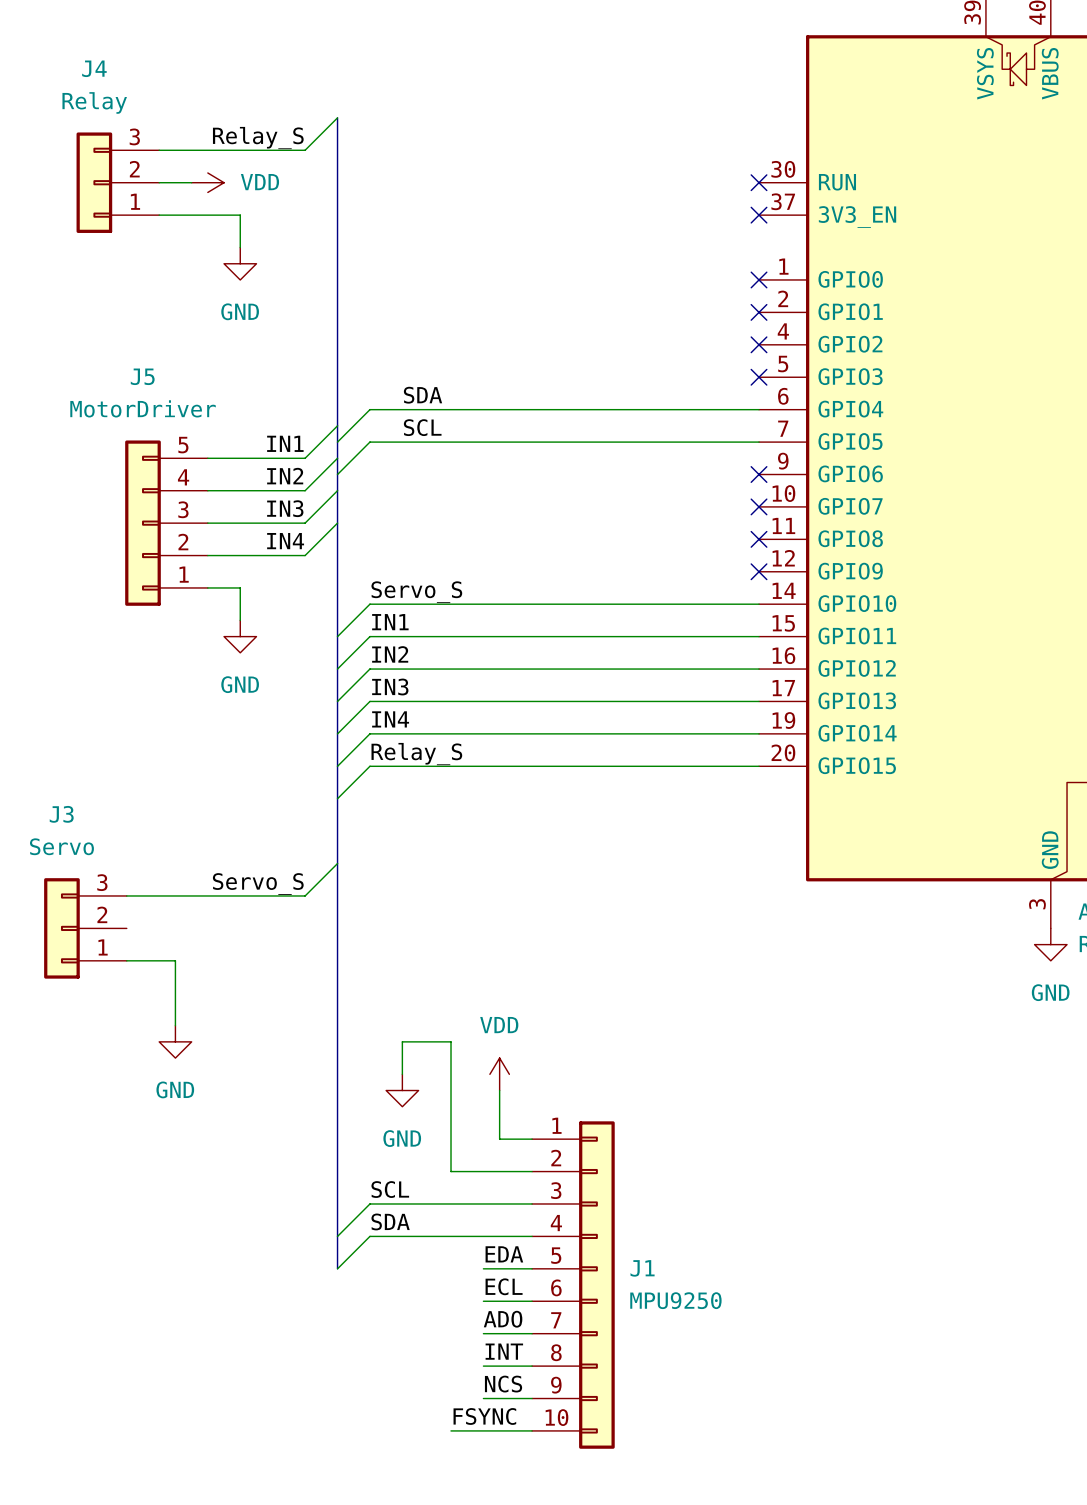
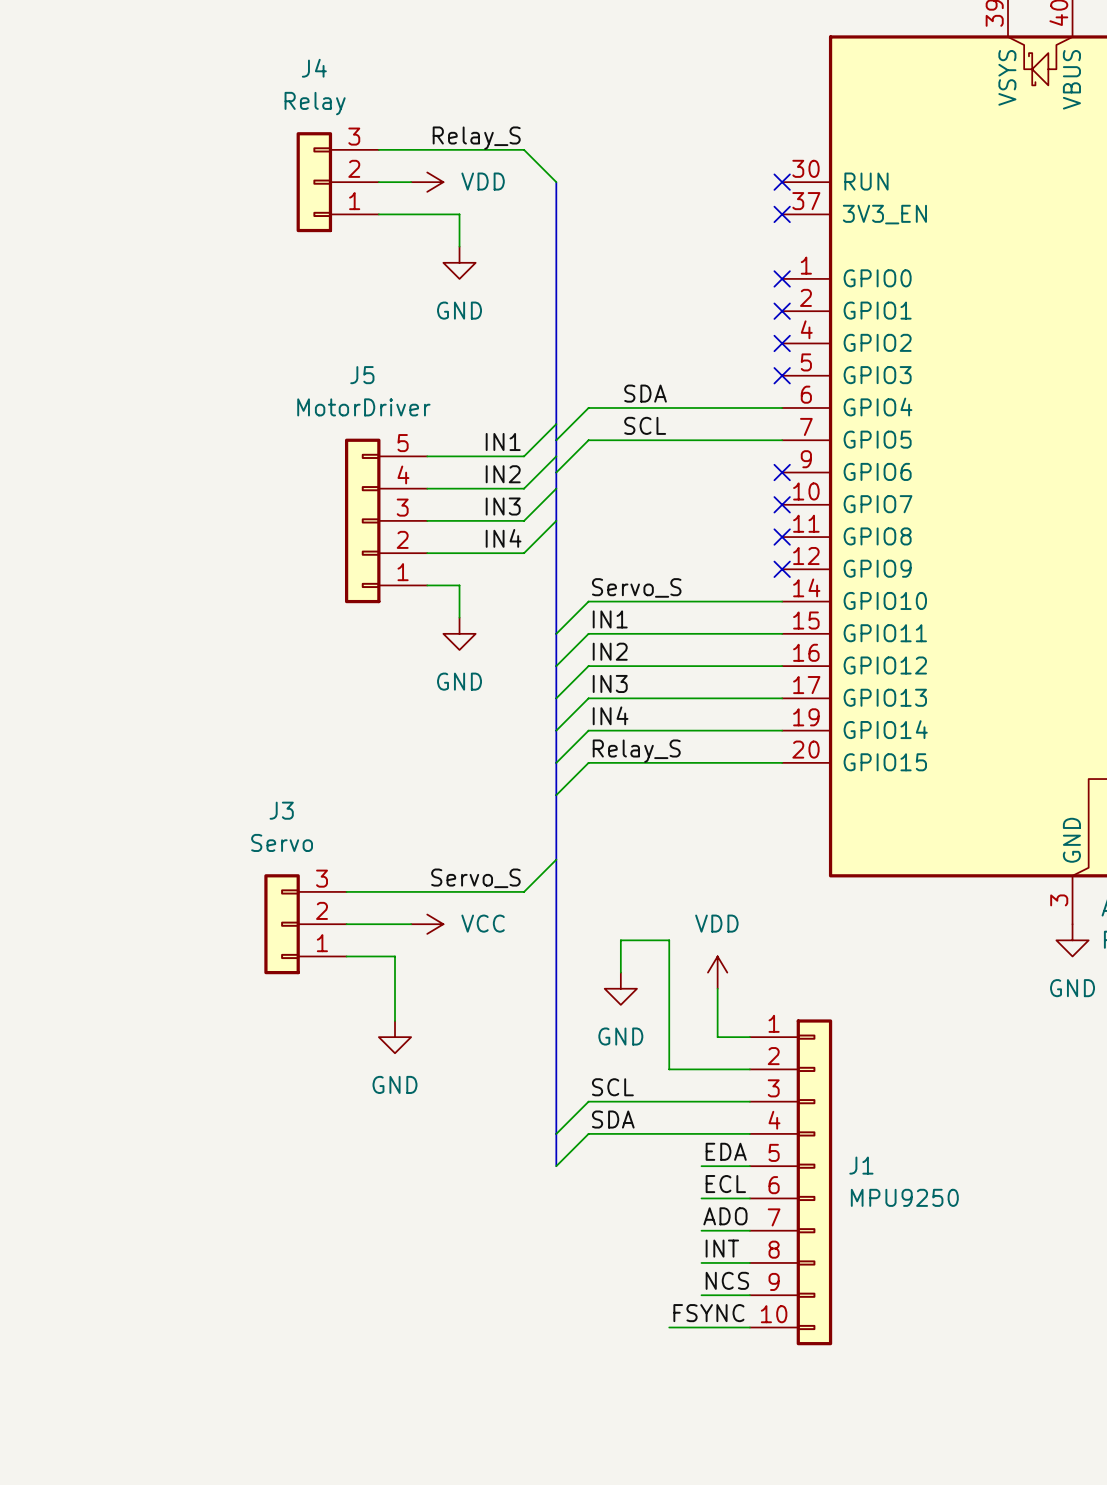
wire: (337, 117) (305, 150) (159, 150) -> none
bus: (337, 117) (337, 1268) -> none
label position: Relay_S (258, 138) -> Relay_S (476, 138)
wire: none -> (378, 149) (524, 149) (556, 182)
J4 position: (117, 182) -> (337, 182)
wire: (159, 182) (191, 182) -> (378, 182) (411, 182)
power symbol position: VDD (207, 182) -> VDD (427, 182)
bus: none -> (556, 182) (556, 1166)
wire: (159, 215) (240, 215) (240, 247) -> (378, 214) (459, 214) (459, 246)
power symbol position: GND (240, 263) -> GND (459, 262)
label position: SDA (423, 395) -> SDA (645, 393)
wire: (564, 409) (369, 409) (337, 442) -> (588, 407) (556, 440)
wire: (337, 425) (305, 458) (207, 458) -> (556, 424) (524, 456) (427, 456)
label position: SCL (422, 427) -> SCL (645, 425)
wire: (564, 442) (369, 442) (337, 474) -> (588, 440) (556, 472)
label: IN1 (285, 443) -> none
label: none -> IN1 (503, 441)
wire: (337, 458) (305, 490) (207, 490) -> (556, 456) (524, 488) (427, 488)
label: IN2 (285, 476) -> none
label: none -> IN2 (503, 474)
wire: (337, 490) (305, 523) (207, 523) -> (556, 488) (524, 520) (427, 520)
label: IN3 (285, 508) -> none
label: none -> IN3 (503, 506)
J5 position: (166, 523) -> (386, 520)
wire: (337, 523) (305, 555) (207, 555) -> (556, 520) (524, 553) (427, 553)
label: IN4 (285, 541) -> none
label: none -> IN4 (503, 538)
wire: (207, 587) (240, 587) (240, 620) -> (427, 585) (459, 585) (459, 617)
label: Servo_S (416, 592) -> none
label: none -> Servo_S (636, 587)
wire: (564, 604) (369, 604) (337, 636) -> (588, 601) (556, 633)
label: IN1 (390, 622) -> none
label: none -> IN1 (610, 619)
power symbol position: GND (240, 636) -> GND (459, 633)
wire: (564, 636) (369, 636) (337, 669) -> (588, 633) (556, 666)
label: IN2 (390, 654) -> none
label: none -> IN2 (610, 651)
wire: (564, 669) (369, 669) (337, 701) -> (588, 666) (556, 698)
label: IN3 (390, 687) -> none
label: none -> IN3 (610, 683)
wire: (564, 701) (369, 701) (337, 733) -> (588, 698) (556, 730)
label: IN4 (390, 719) -> none
label: none -> IN4 (610, 715)
wire: (564, 733) (369, 733) (337, 766) -> (588, 730) (556, 762)
label position: Relay_S (416, 754) -> Relay_S (636, 751)
wire: (564, 766) (369, 766) (337, 798) -> (588, 762) (556, 795)
wire: (337, 863) (305, 895) (126, 895) -> (556, 859) (524, 891) (346, 891)
label: Servo_S (258, 883) -> none
label: none -> Servo_S (475, 878)
J3 position: (85, 928) -> (305, 924)
wire: none -> (346, 924) (411, 924)
power symbol: none -> VCC (427, 924)
wire: (126, 960) (175, 960) (175, 1025) -> (346, 956) (395, 956) (395, 1021)
wire: none -> (620, 972) (620, 940) (669, 940) (669, 1069) (749, 1069)
power symbol: none -> GND (620, 988)
wire: none -> (717, 988) (717, 1037) (749, 1037)
power symbol: GND (175, 1041) -> none
wire: (402, 1074) (402, 1041) (451, 1041) (451, 1171) (532, 1171) -> (749, 1133) (588, 1133) (556, 1166)
power symbol position: VDD (499, 1074) -> VDD (717, 972)
power symbol position: GND (402, 1090) -> GND (395, 1037)
wire: (499, 1090) (499, 1139) (532, 1139) -> (749, 1101) (588, 1101) (556, 1133)
label position: SCL (390, 1189) -> SCL (612, 1087)
wire: (532, 1203) (369, 1203) (337, 1236) -> none
label position: SDA (390, 1221) -> SDA (613, 1119)
wire: (532, 1236) (369, 1236) (337, 1268) -> none
label position: EDA (504, 1254) -> EDA (726, 1151)
wire: (483, 1268) (532, 1268) -> (701, 1262) (749, 1262)
J1 position: (573, 1285) -> (791, 1182)
label position: ECL (504, 1286) -> ECL (725, 1184)
wire: (483, 1301) (532, 1301) -> (701, 1295) (749, 1295)
label position: ADO (503, 1319) -> ADO (725, 1216)
wire: (483, 1333) (532, 1333) -> (701, 1230) (749, 1230)
label position: INT (504, 1351) -> INT (722, 1248)
wire: (483, 1366) (532, 1366) -> (701, 1198) (749, 1198)
label position: NCS (503, 1384) -> NCS (727, 1280)
wire: (483, 1398) (532, 1398) -> (701, 1166) (749, 1166)
label position: FSYNC (484, 1416) -> FSYNC (708, 1313)
wire: (451, 1430) (532, 1430) -> (669, 1327) (749, 1327)

